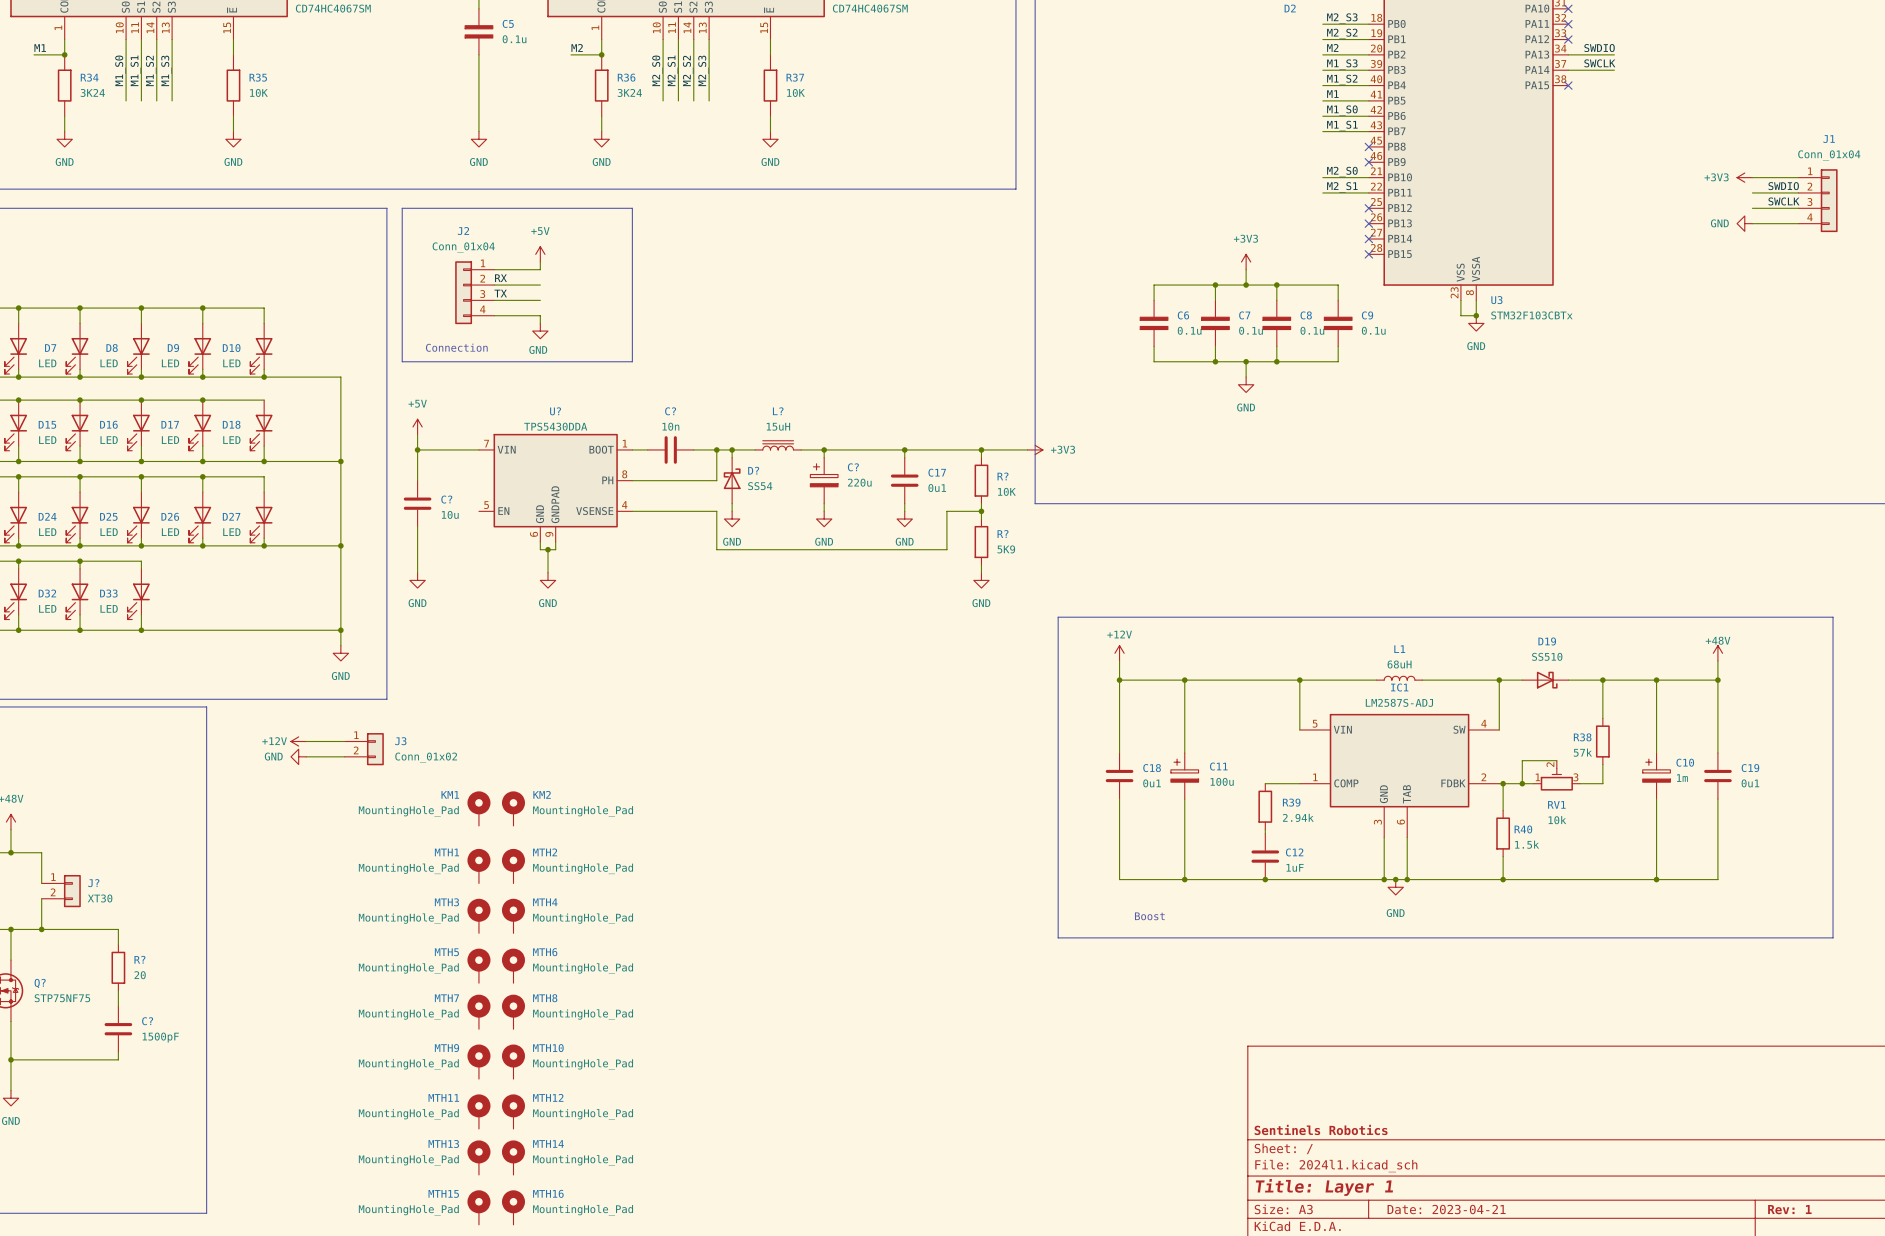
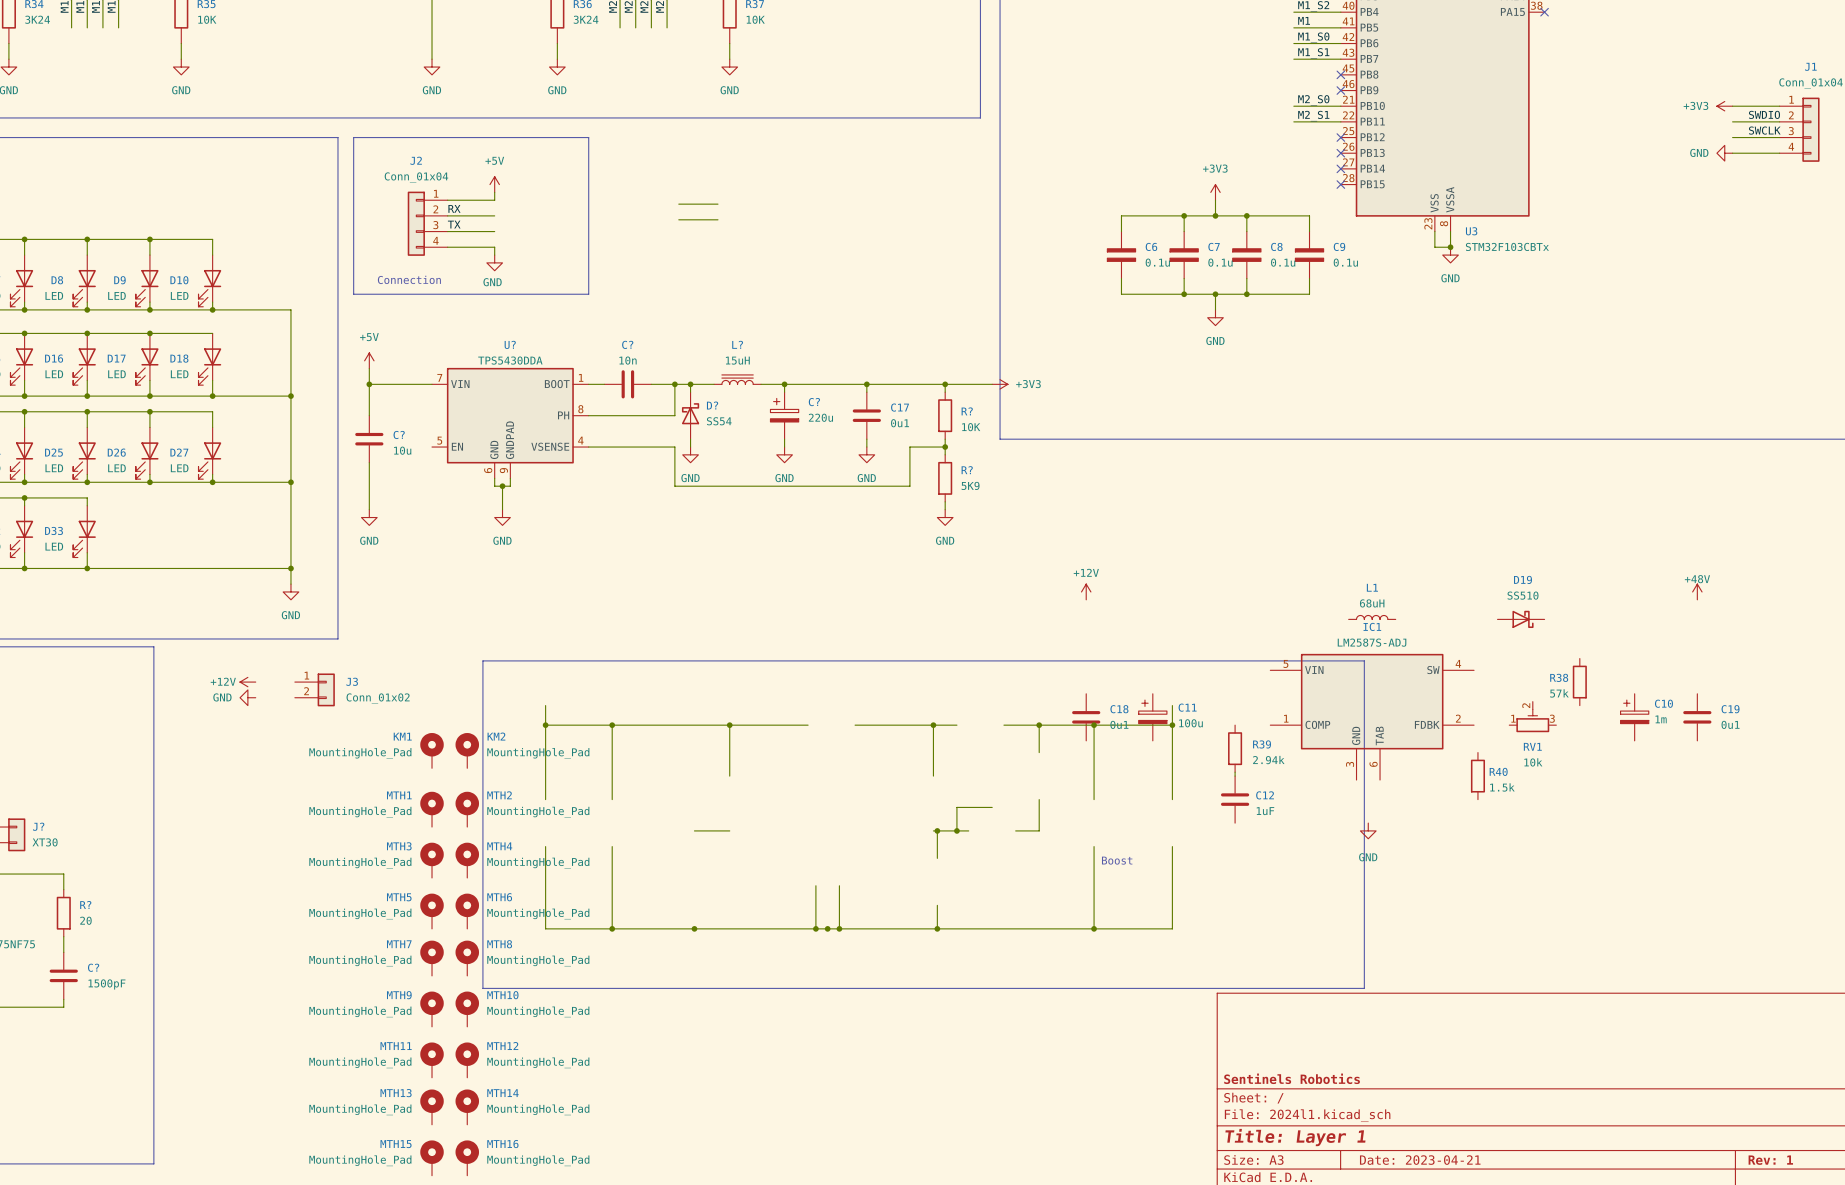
wire: none -> (678, 204) (717, 204)
wire: none -> (678, 219) (717, 219)
line: (1058, 617) (1833, 617) (1833, 937) (1058, 937) (1058, 617) -> none
wire: (1119, 660) (1119, 753) -> (1172, 705) (1172, 799)
wire: (1717, 660) (1717, 753) -> none
wire: (1119, 680) (1376, 680) -> none
junction: (1119, 680) -> none
wire: (1184, 680) (1184, 753) -> (1094, 725) (1094, 799)
junction: (1184, 680) -> none
wire: (1299, 680) (1299, 729) -> none
junction: (1299, 680) -> none
wire: (1422, 680) (1522, 680) -> none
wire: (1499, 680) (1499, 729) -> none
junction: (1499, 680) -> none
wire: (1568, 680) (1717, 680) -> none
wire: (1602, 680) (1602, 718) -> none
junction: (1602, 680) -> none
wire: (1656, 680) (1656, 753) -> none
junction: (1656, 680) -> none
junction: (1717, 680) -> none
line: none -> (482, 660) (1364, 660) (1364, 988) (482, 988) (482, 660)
wire: (306, 741) (344, 741) -> none
wire: (306, 756) (344, 756) -> none
wire: (1556, 760) (1522, 760) (1522, 783) -> none
wire: none -> (545, 705) (545, 799)
wire: (1602, 764) (1602, 783) (1579, 783) -> none
wire: none -> (545, 725) (808, 725)
junction: none -> (545, 725)
wire: none -> (612, 725) (612, 799)
junction: none -> (612, 725)
wire: none -> (729, 725) (729, 776)
junction: none -> (729, 725)
wire: none -> (855, 725) (956, 725)
wire: none -> (933, 725) (933, 776)
junction: none -> (933, 725)
wire: none -> (1003, 725) (1172, 725)
wire: none -> (1039, 725) (1039, 752)
junction: none -> (1039, 725)
junction: none -> (1094, 725)
junction: none -> (1172, 725)
wire: (1265, 783) (1299, 783) -> none
wire: (1499, 783) (1533, 783) -> none
wire: (1503, 783) (1503, 810) -> none
junction: (1503, 783) -> none
junction: (1522, 783) -> none
wire: (1119, 799) (1119, 879) (1717, 879) (1717, 799) -> none
wire: (1184, 799) (1184, 879) -> (1094, 846) (1094, 928)
wire: (1656, 799) (1656, 879) -> none
wire: (1384, 837) (1384, 879) -> none
wire: (1407, 837) (1407, 879) -> none
wire: none -> (1039, 799) (1039, 830) (1015, 830)
wire: (1503, 856) (1503, 879) -> none
wire: none -> (992, 807) (956, 807) (956, 830)
junction: (1184, 879) -> none
junction: (1265, 879) -> none
junction: (1384, 879) -> none
junction: (1395, 879) -> none
junction: (1407, 879) -> none
junction: (1503, 879) -> none
junction: (1656, 879) -> none
wire: none -> (694, 830) (729, 830)
wire: none -> (933, 830) (968, 830)
wire: none -> (937, 830) (937, 858)
junction: none -> (937, 830)
junction: none -> (956, 830)
wire: none -> (545, 846) (545, 928) (1172, 928) (1172, 846)
wire: none -> (612, 846) (612, 928)
wire: none -> (815, 885) (815, 928)
wire: none -> (839, 885) (839, 928)
wire: none -> (937, 905) (937, 928)
junction: none -> (612, 928)
junction: none -> (694, 928)
junction: none -> (815, 928)
junction: none -> (827, 928)
junction: none -> (839, 928)
junction: none -> (937, 928)
junction: none -> (1094, 928)

